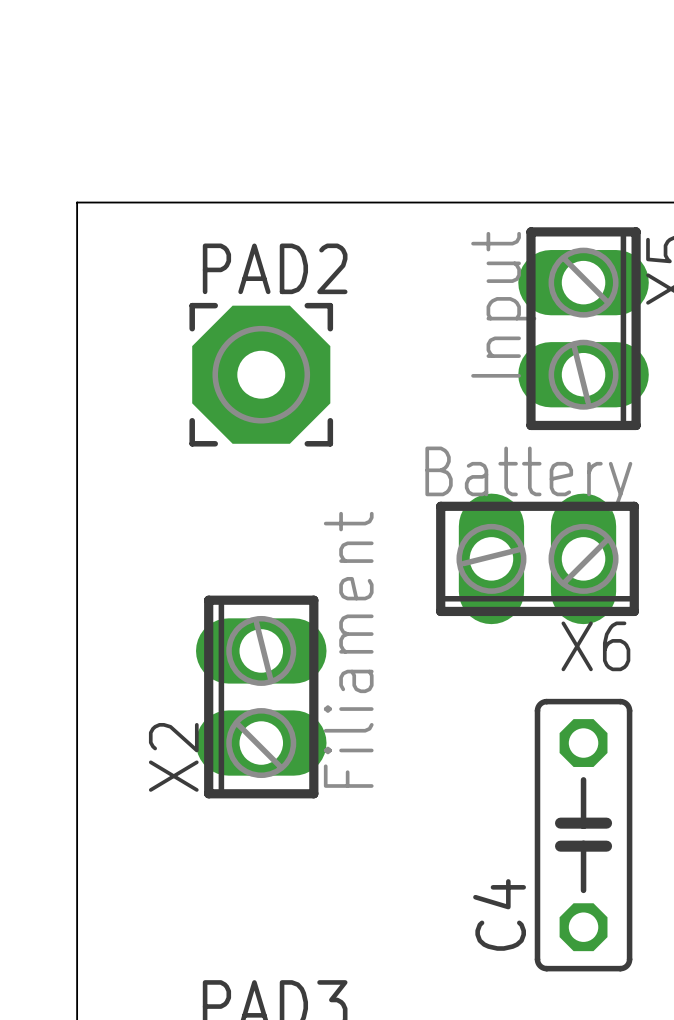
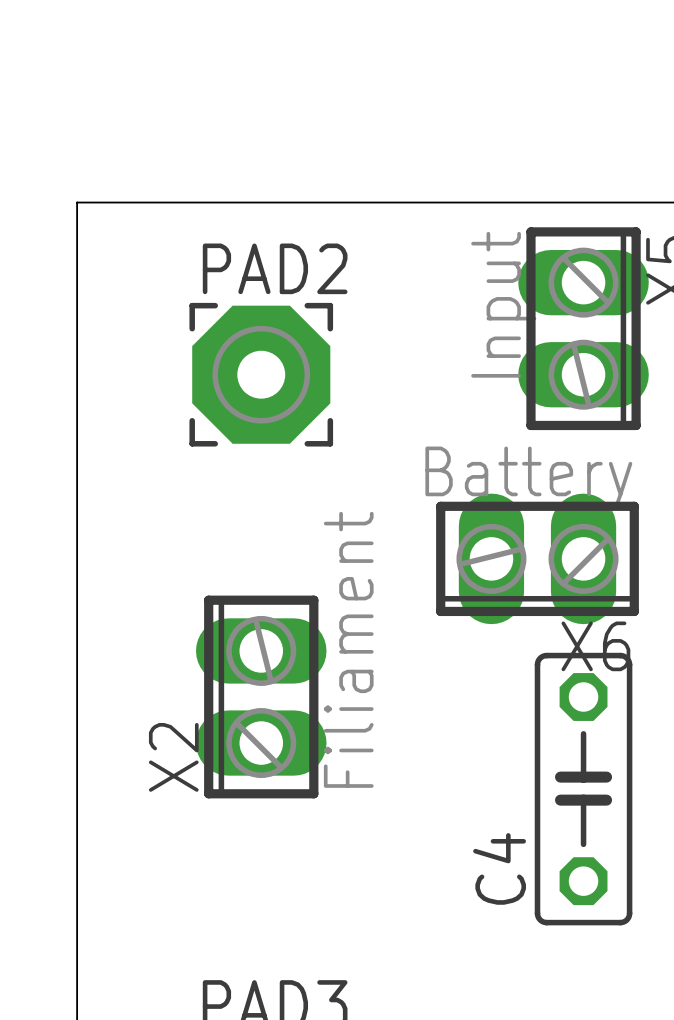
C4 position: (583, 835) -> (583, 789)

